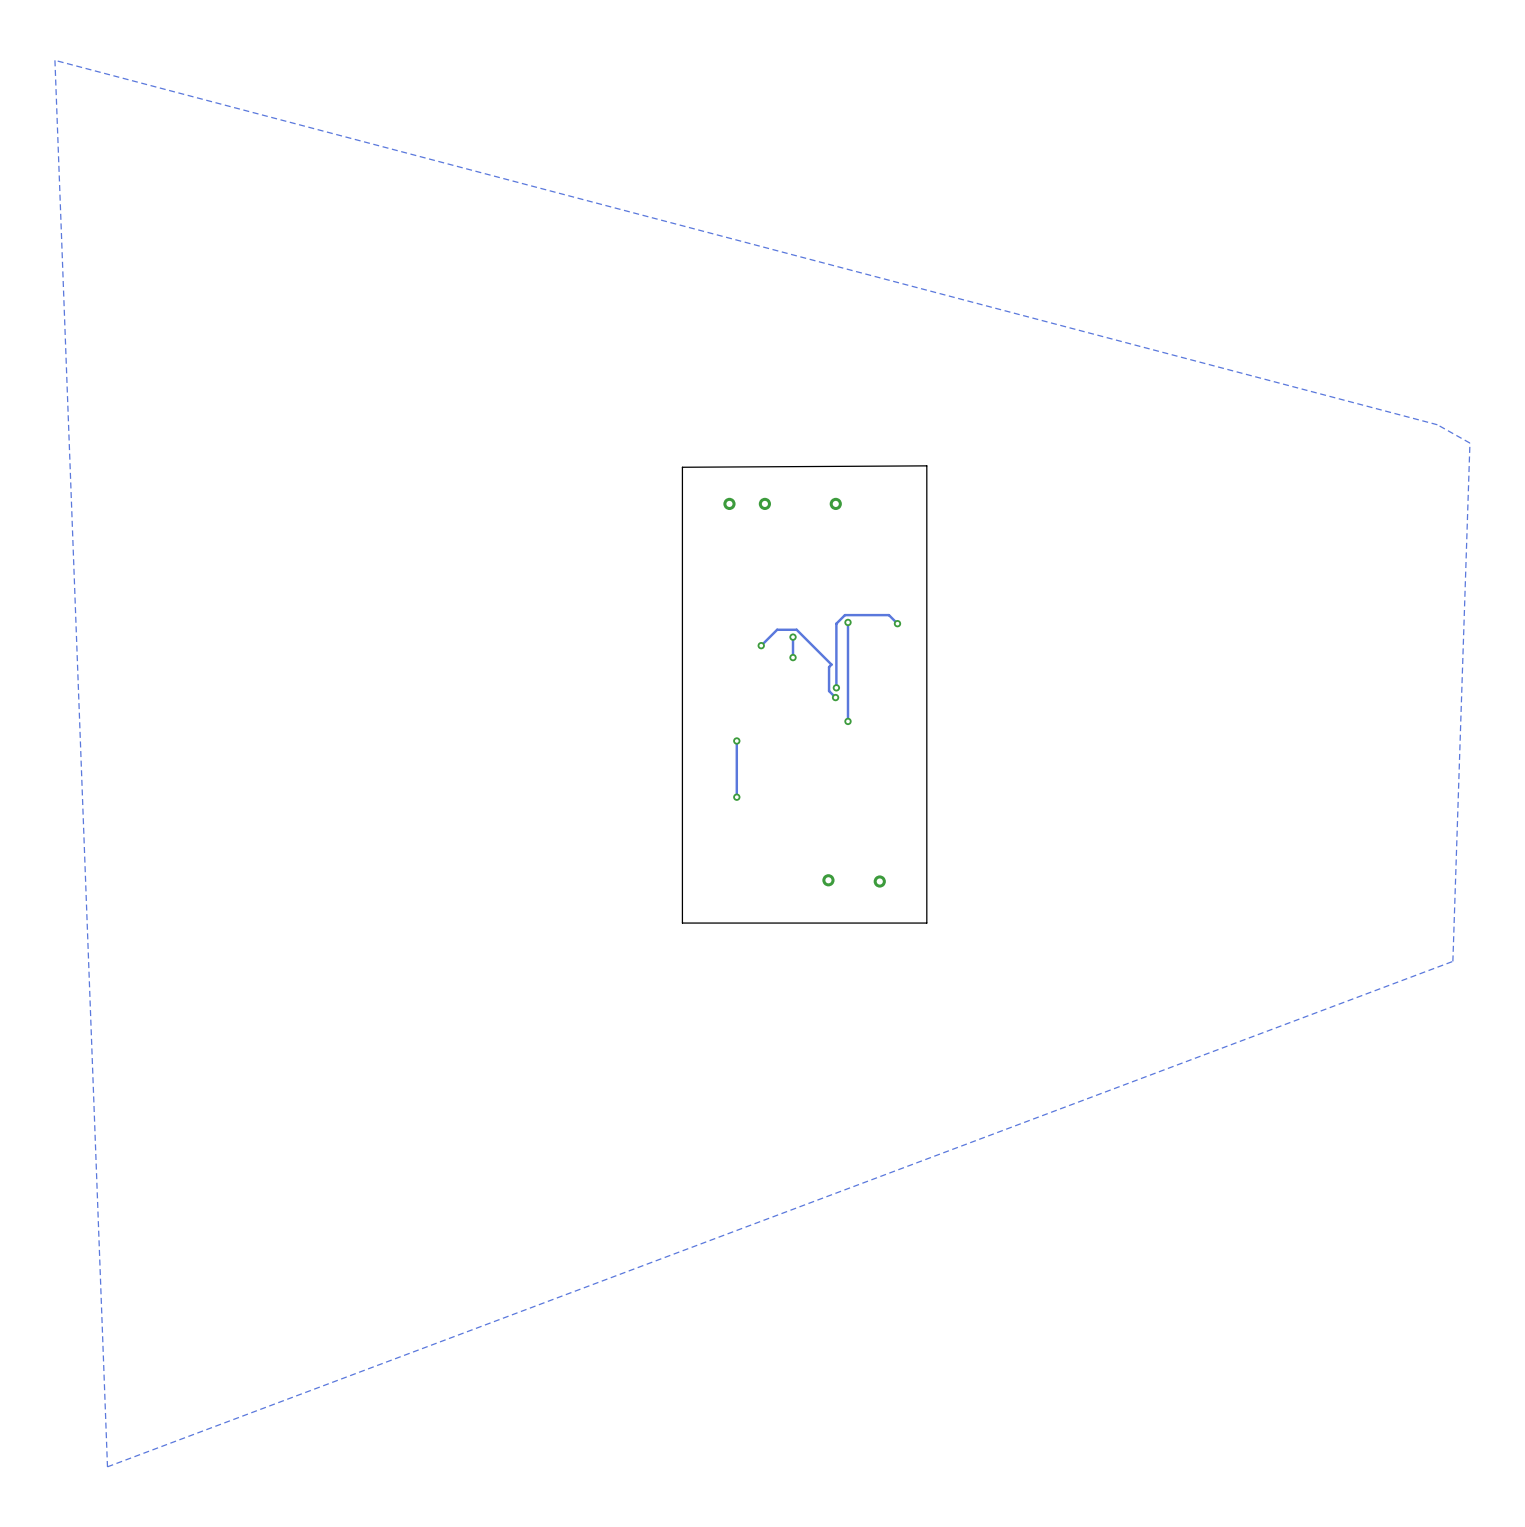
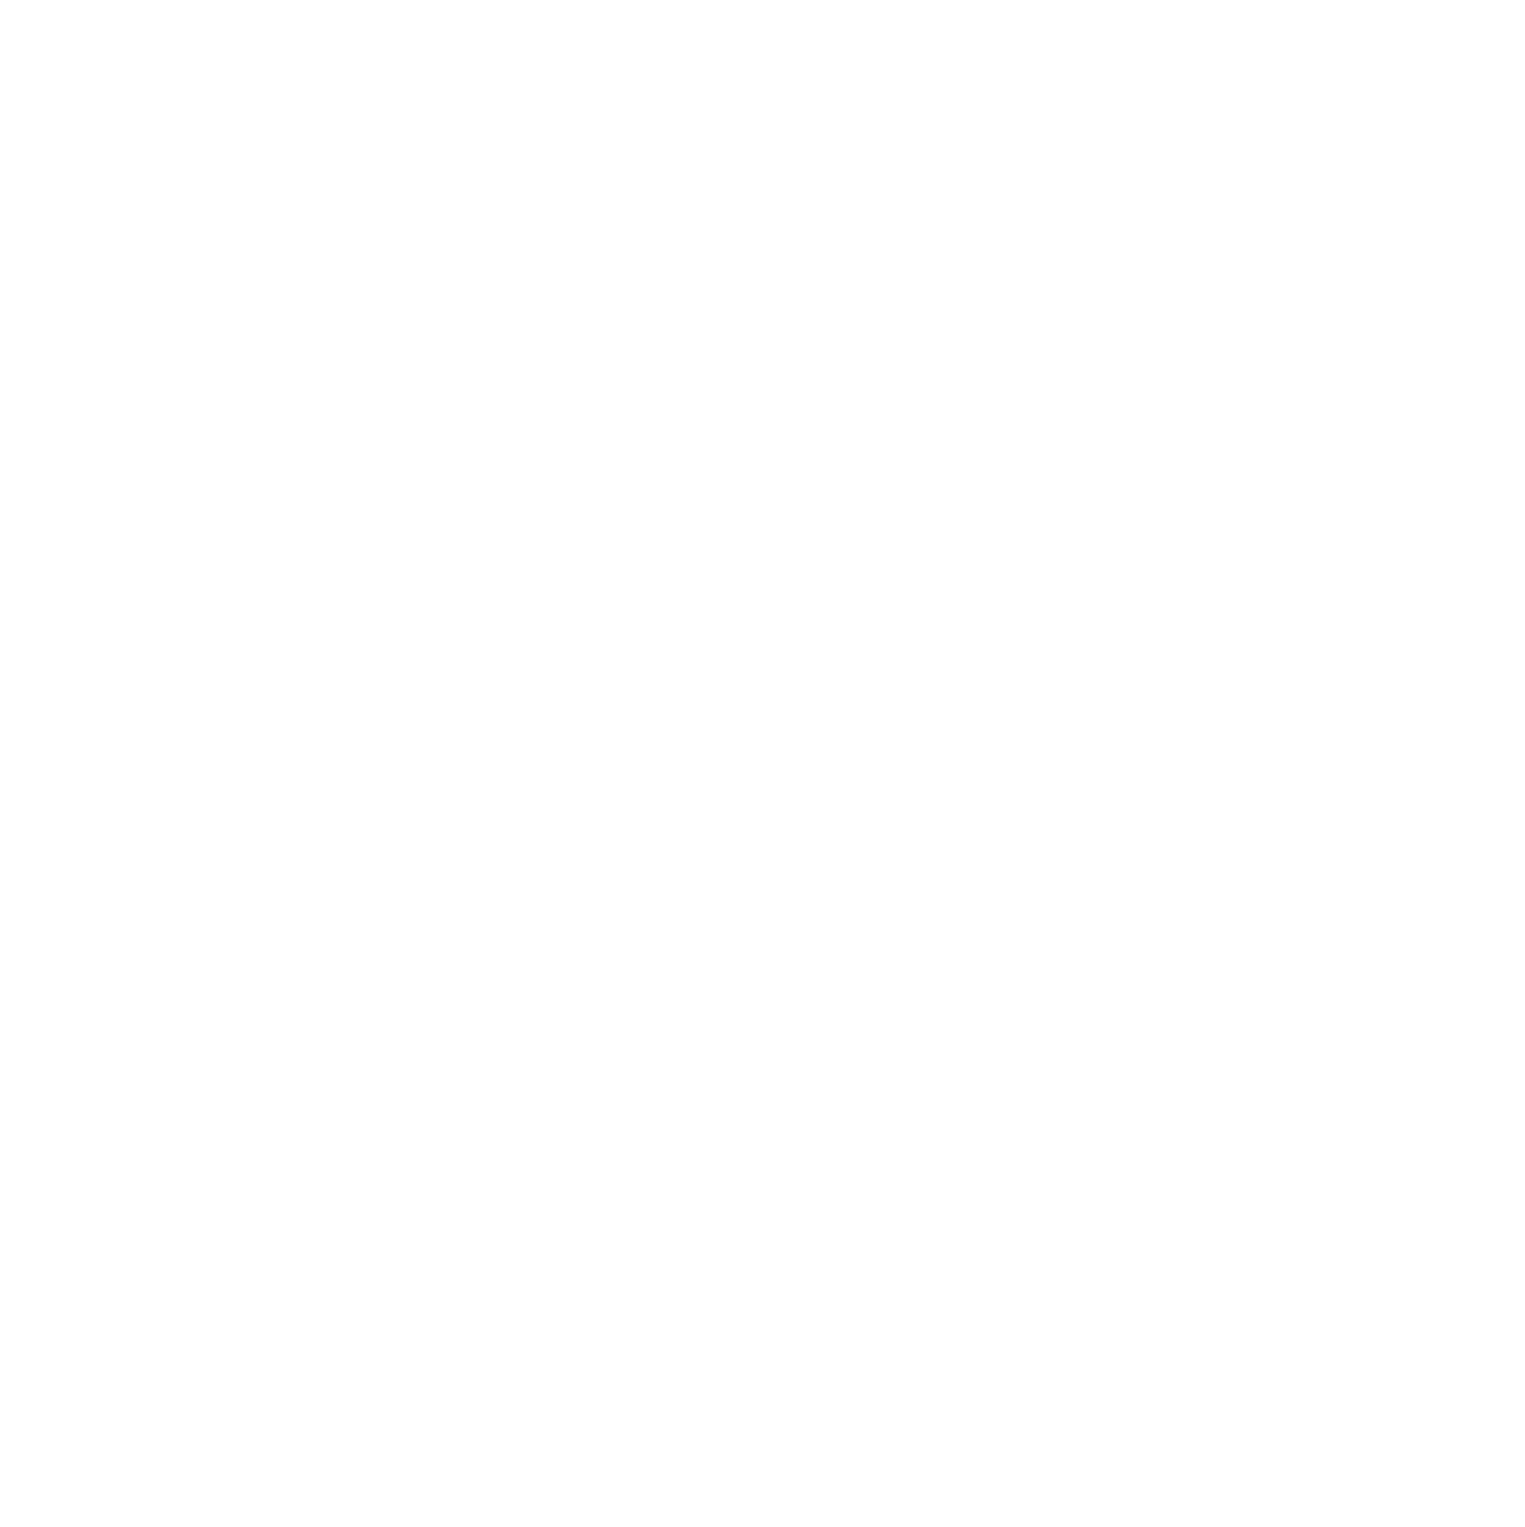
zone outline: (54, 60) (1437, 424) (1469, 443) (1452, 961) (107, 1466) (54, 60) -> none
board edge: (926, 465) (926, 923) (682, 923) (682, 467) (926, 465) -> none
part: (729, 503) -> none
part: (764, 503) -> none
part: (835, 503) -> none
track: (847, 622) (847, 723) -> none
via: (847, 622) -> none
track: (897, 623) (888, 615) (844, 615) (836, 623) (836, 687) -> none
via: (897, 623) -> none
track: (793, 637) (793, 657) -> none
via: (793, 637) -> none
track: (761, 645) (777, 629) (796, 629) (831, 664) (829, 667) (829, 691) (835, 697) -> none
via: (761, 645) -> none
via: (793, 657) -> none
via: (836, 687) -> none
via: (835, 697) -> none
via: (847, 721) -> none
track: (736, 740) (736, 797) -> none
via: (736, 740) -> none
via: (736, 797) -> none
part: (828, 880) -> none
part: (879, 881) -> none

